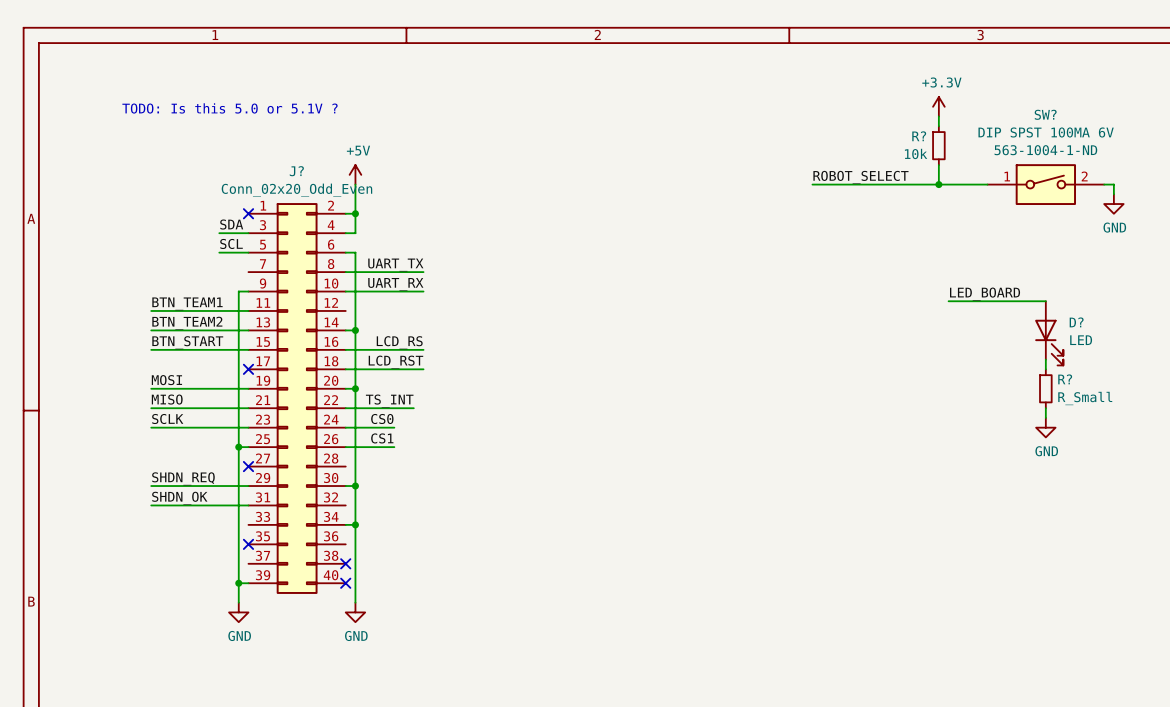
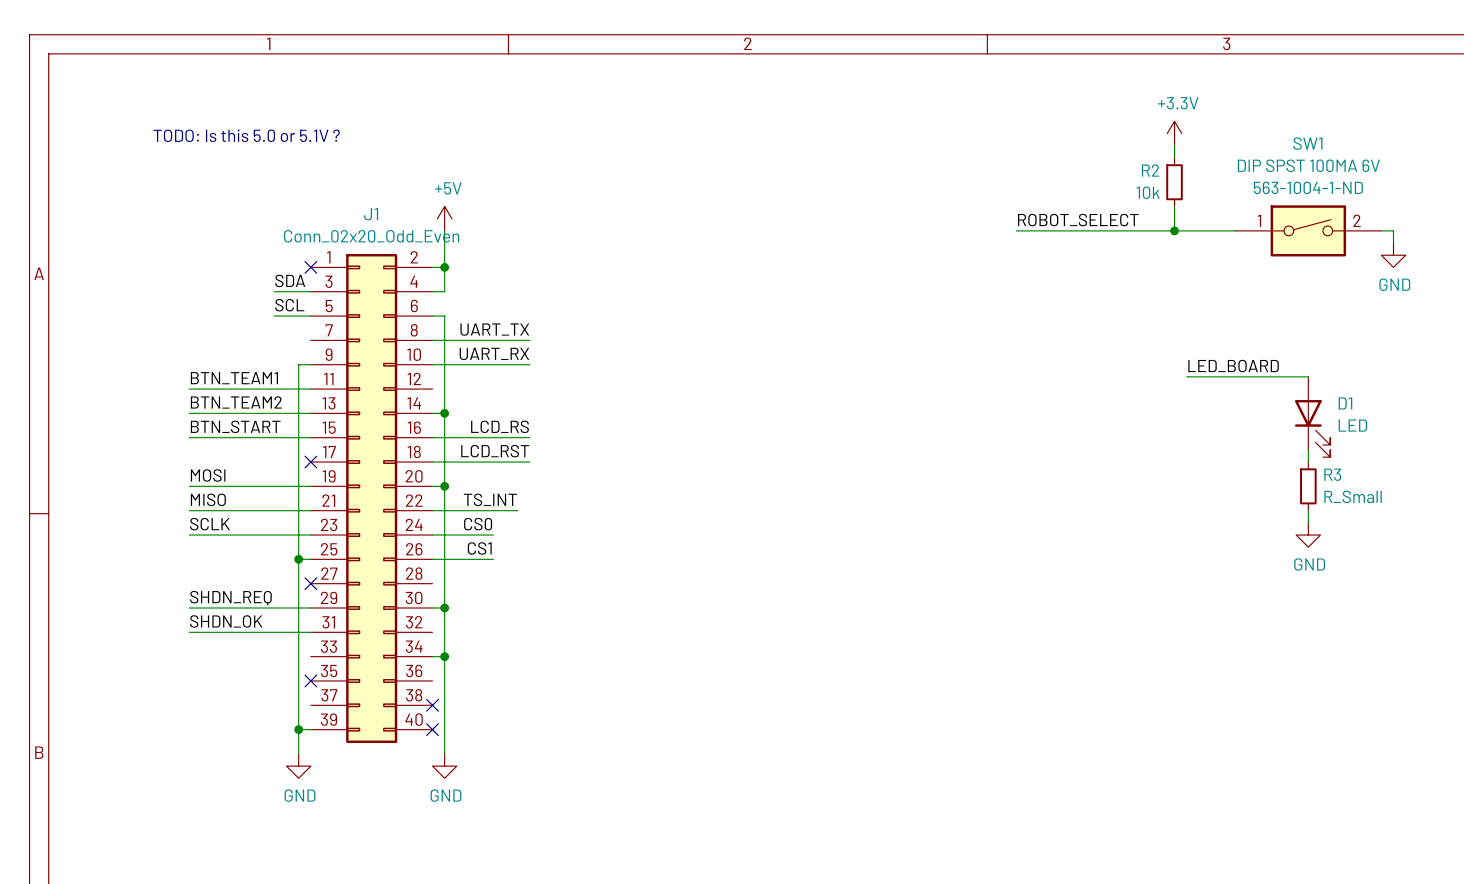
SW? name: SW? (1045, 114) -> SW1 (1307, 143)
R? name: R? (919, 136) -> R2 (1150, 170)
J? name: J? (296, 171) -> J1 (371, 214)
D? name: D? (1076, 322) -> D1 (1345, 403)
R? name: R? (1065, 379) -> R3 (1332, 474)

